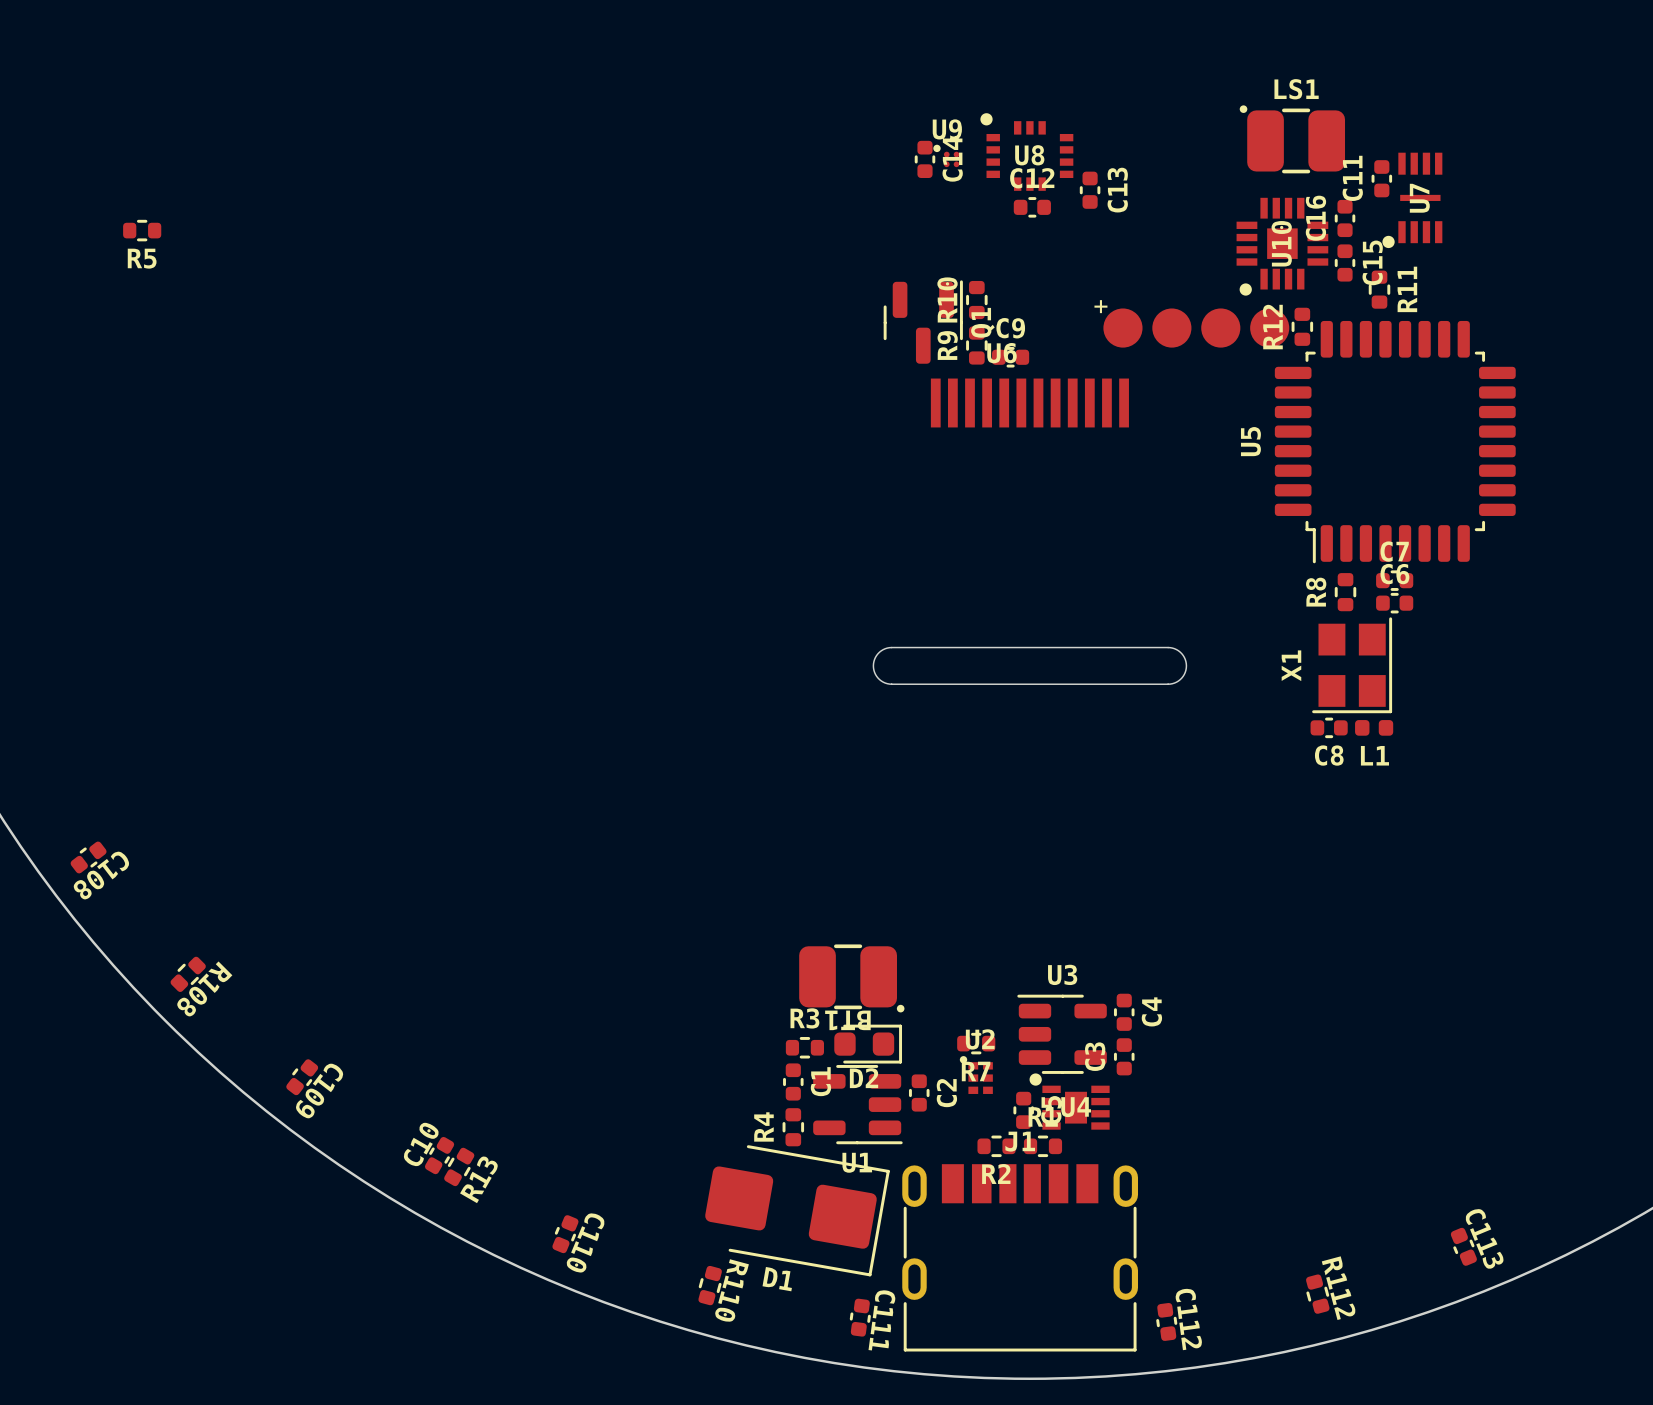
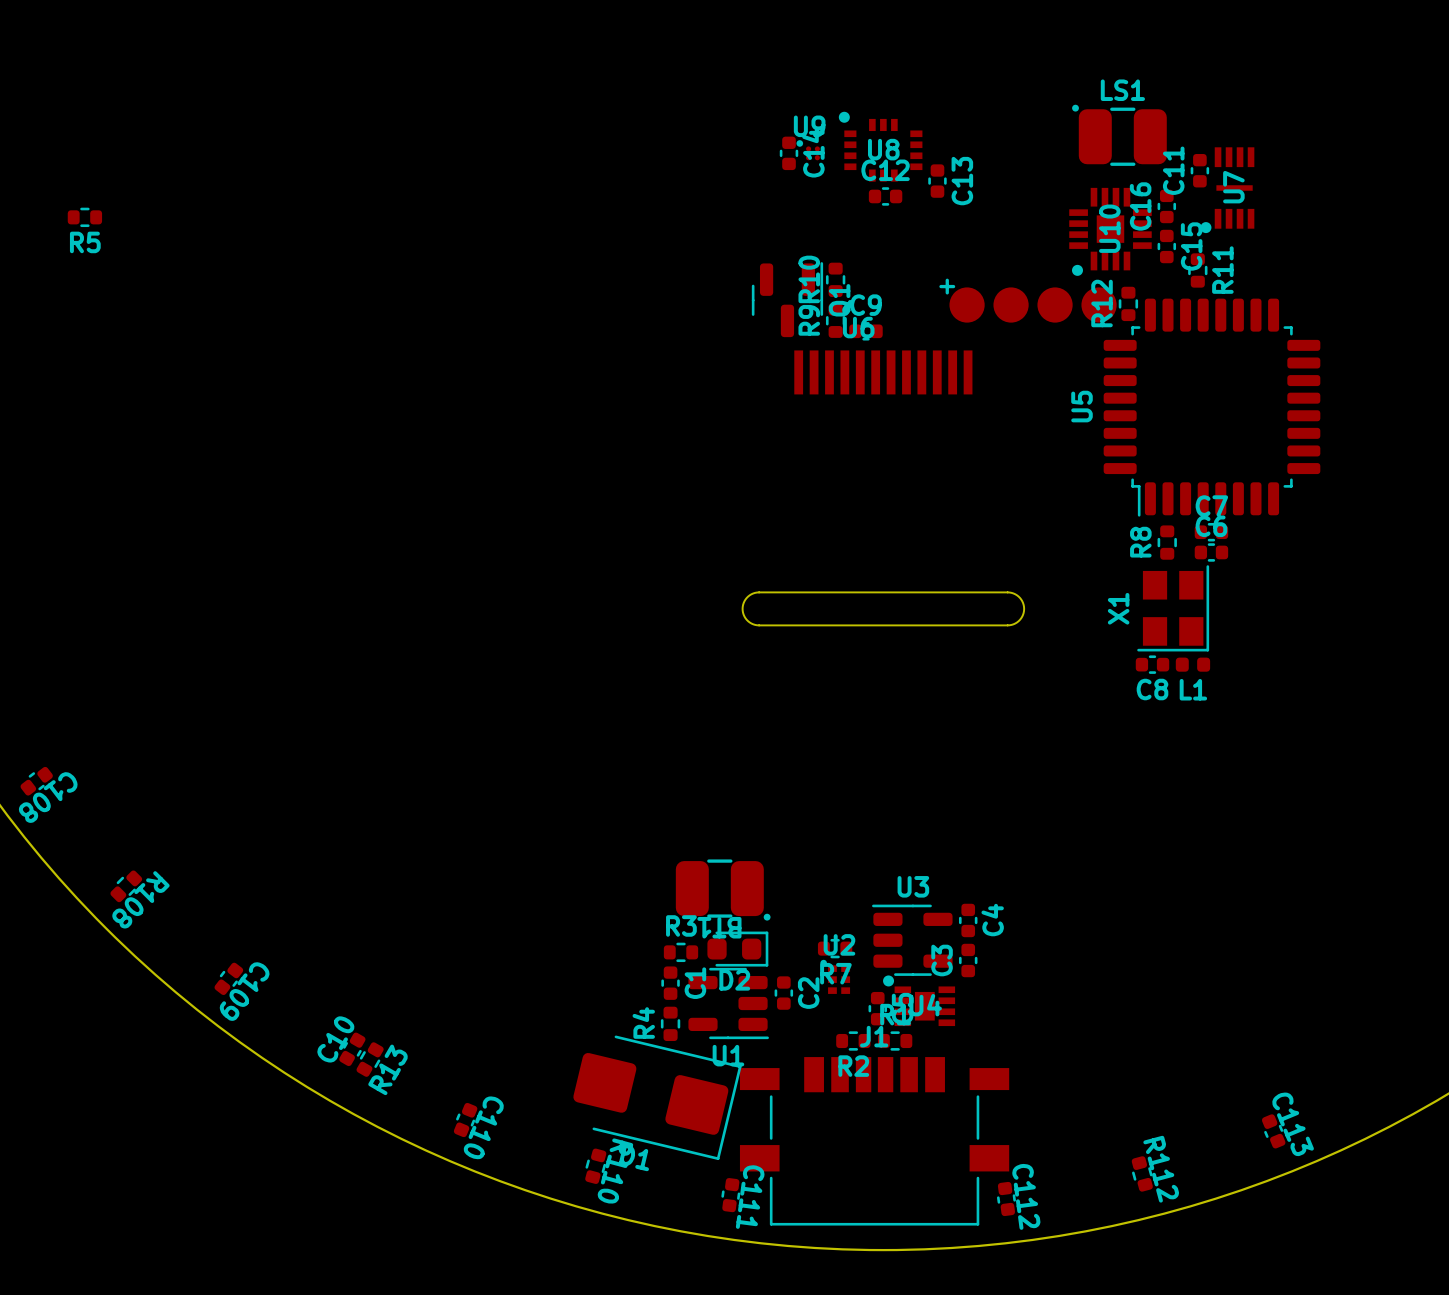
J1 footprint: [902, 1164, 1139, 1352] -> [739, 1057, 1010, 1226]
D1 rotation: 0° (797, 1210) -> 3.5° clockwise (657, 1097)

